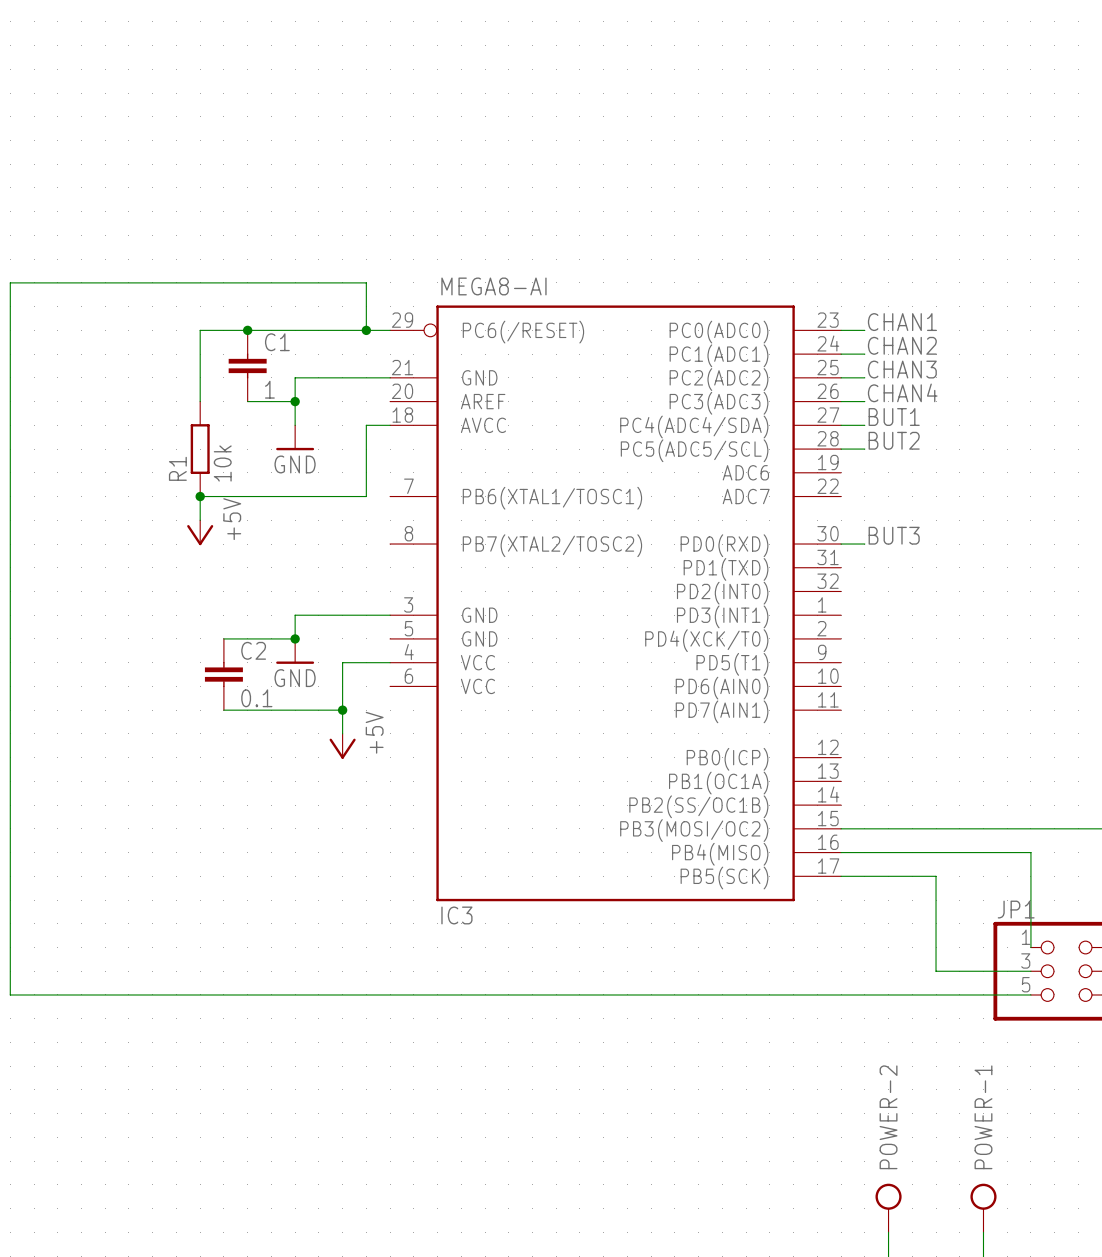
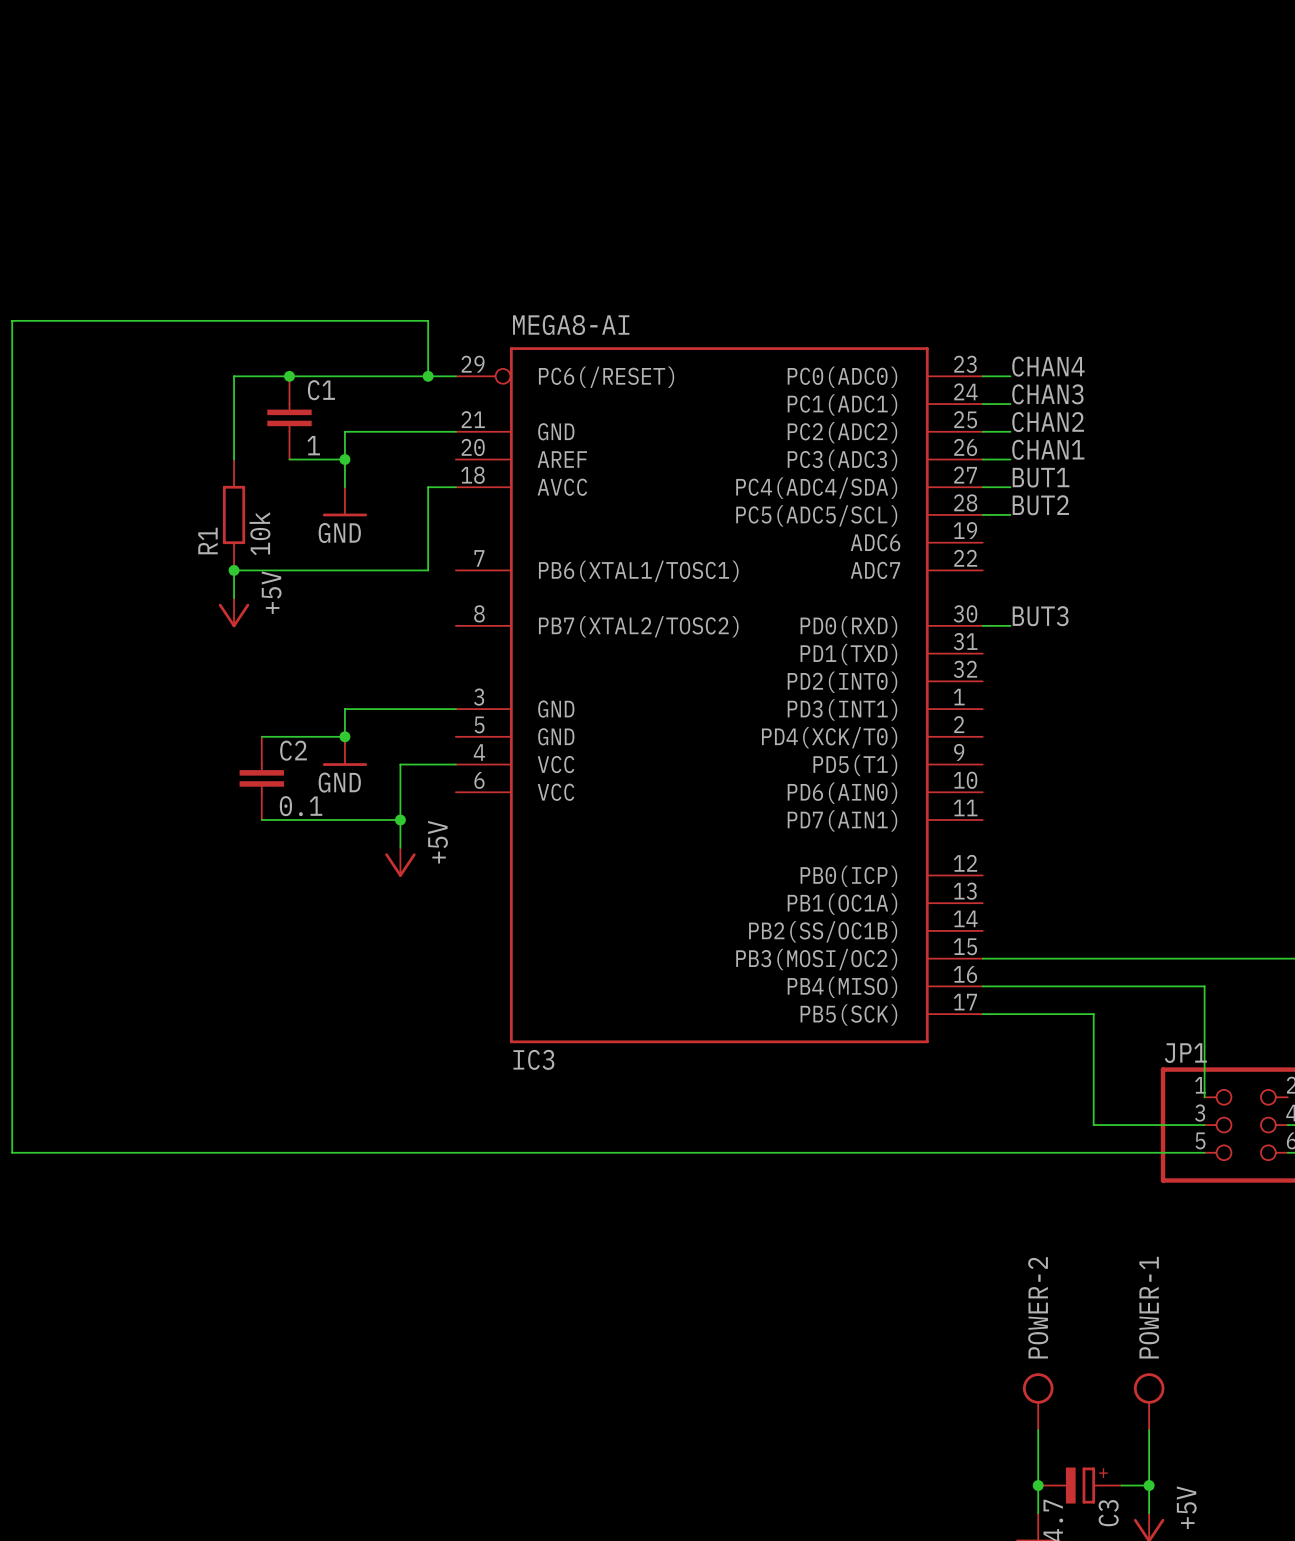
label: CHAN1 (902, 322) -> CHAN4 (1048, 366)
label: CHAN2 (902, 345) -> CHAN3 (1047, 394)
label: CHAN3 (902, 369) -> CHAN2 (1048, 422)
label: CHAN4 (902, 392) -> CHAN1 (1048, 449)

